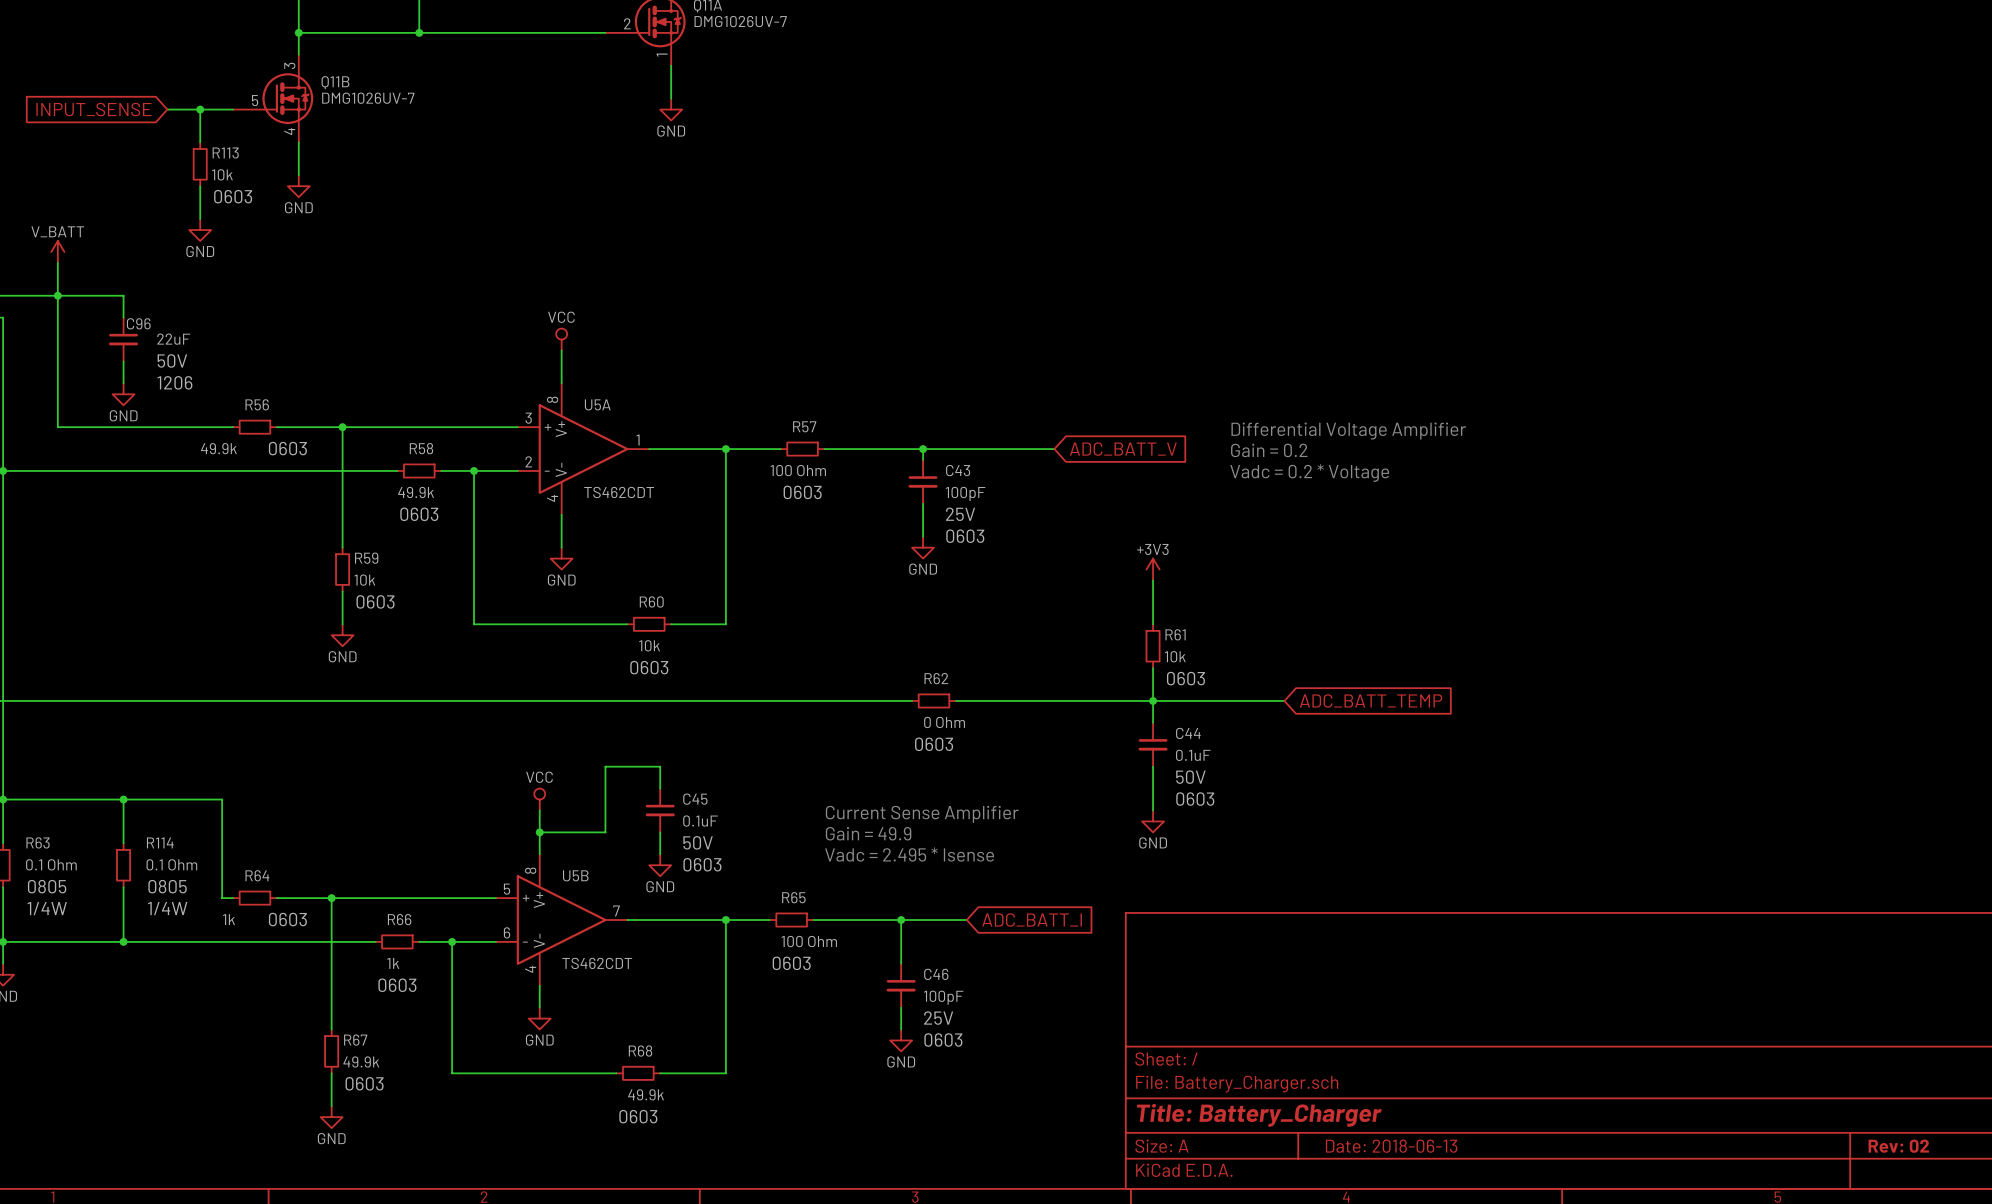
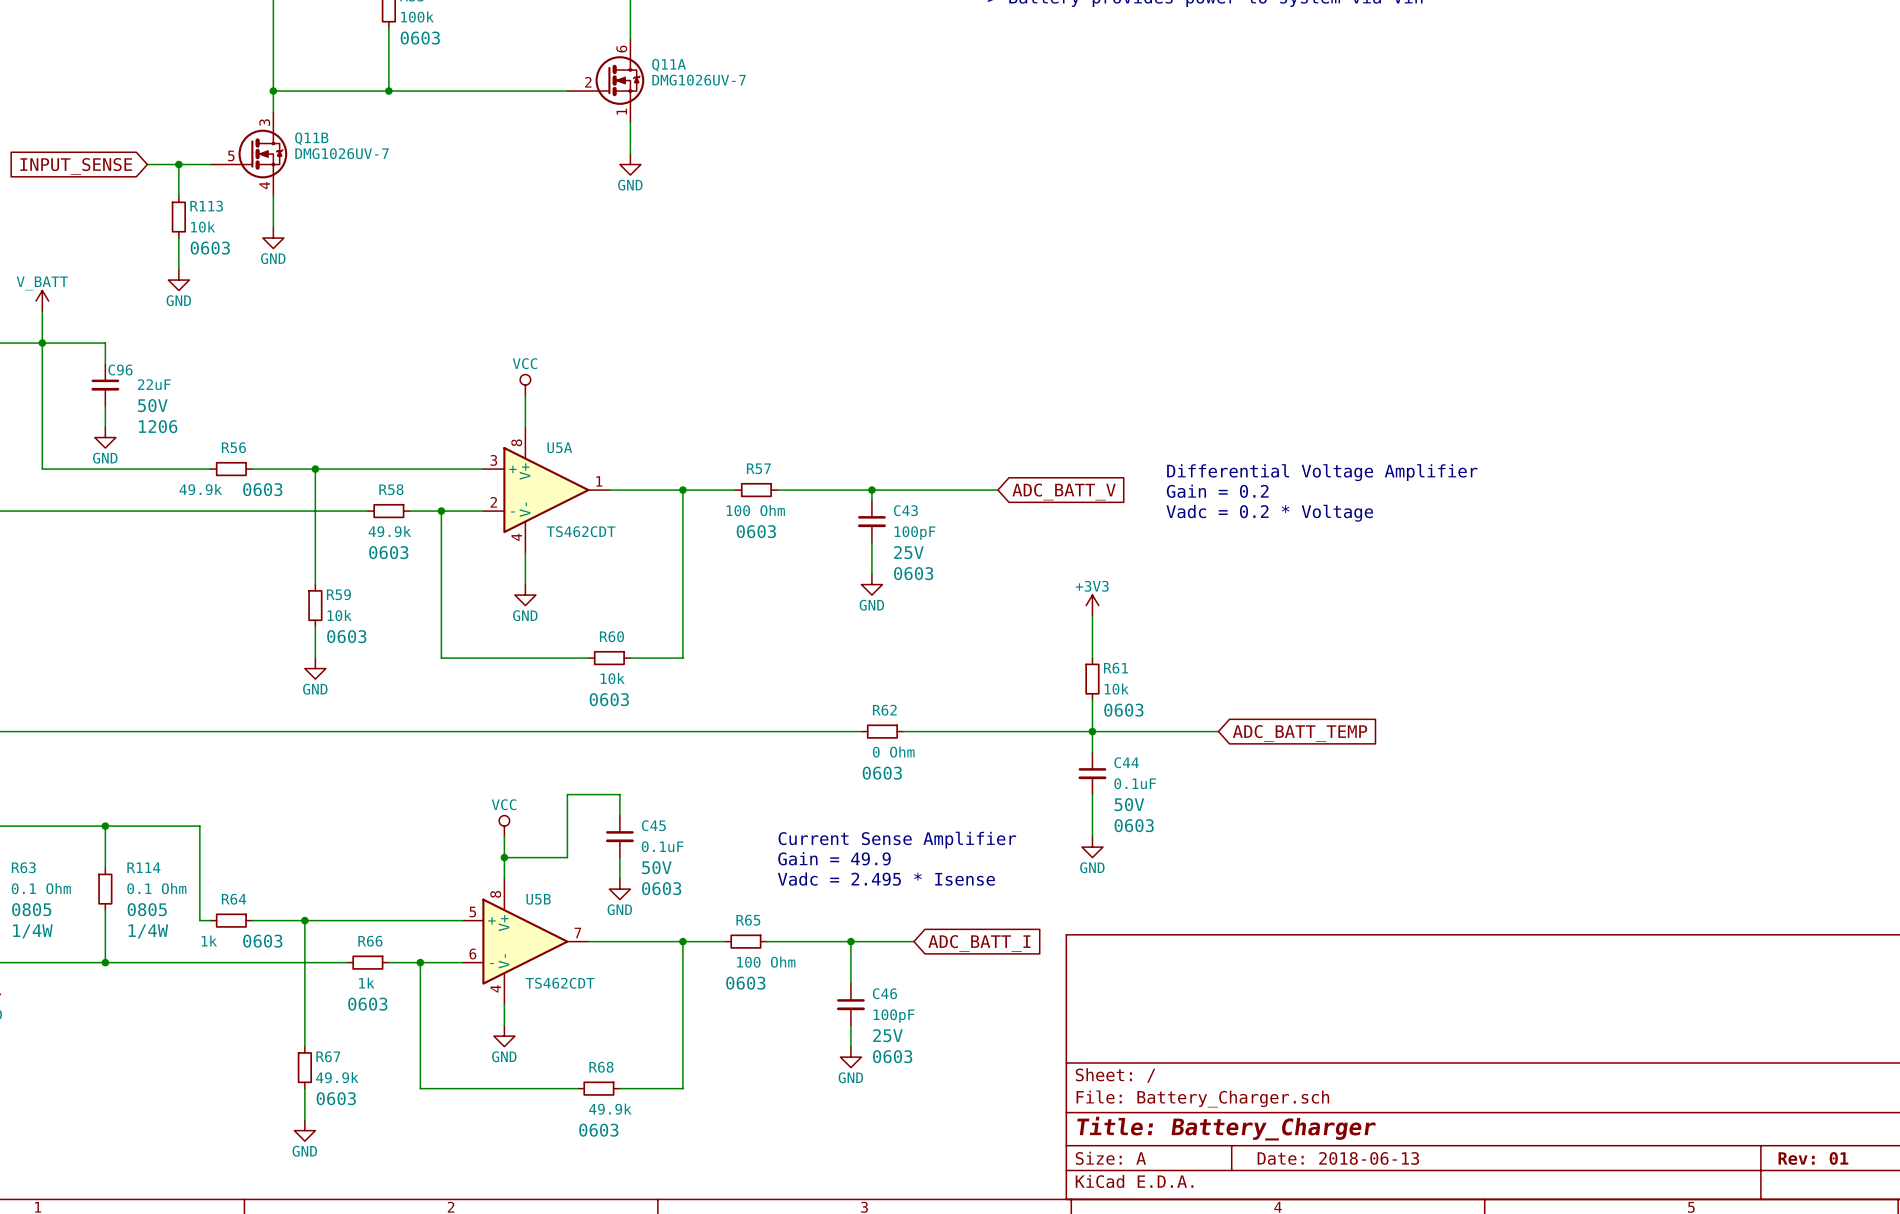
title block: Rev: 02 (1898, 1146) -> Rev: 01 (1813, 1158)

